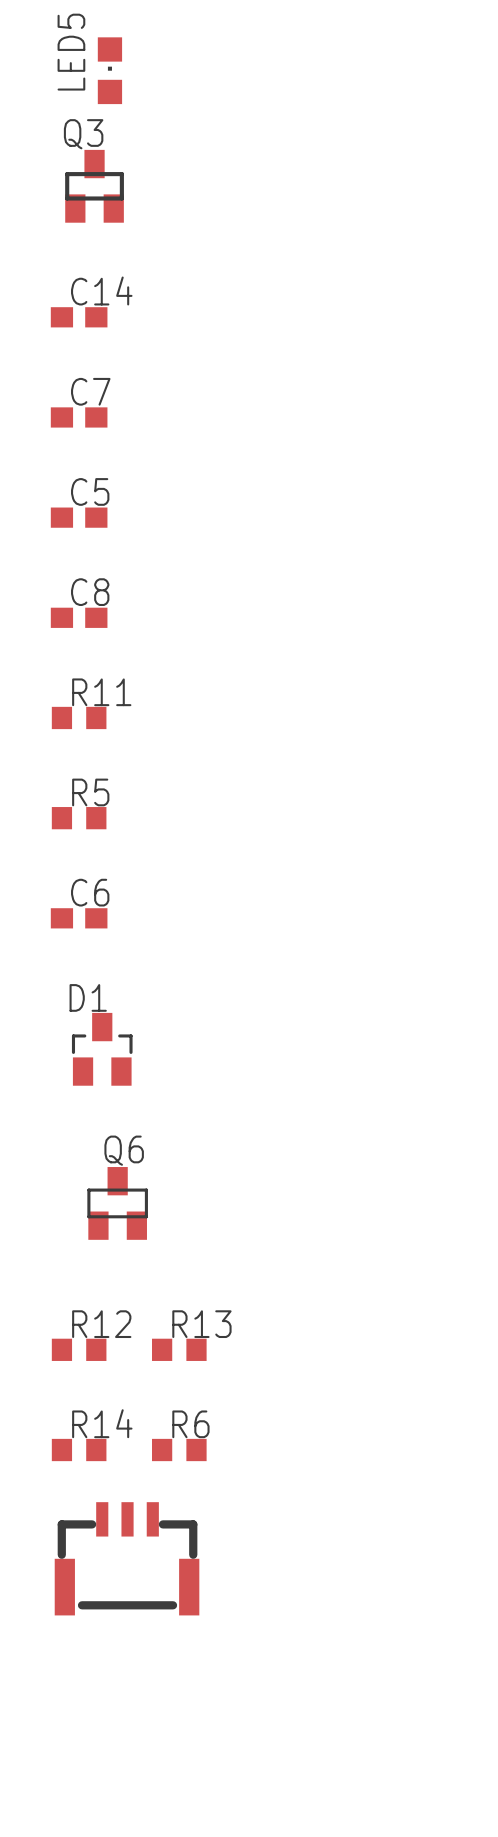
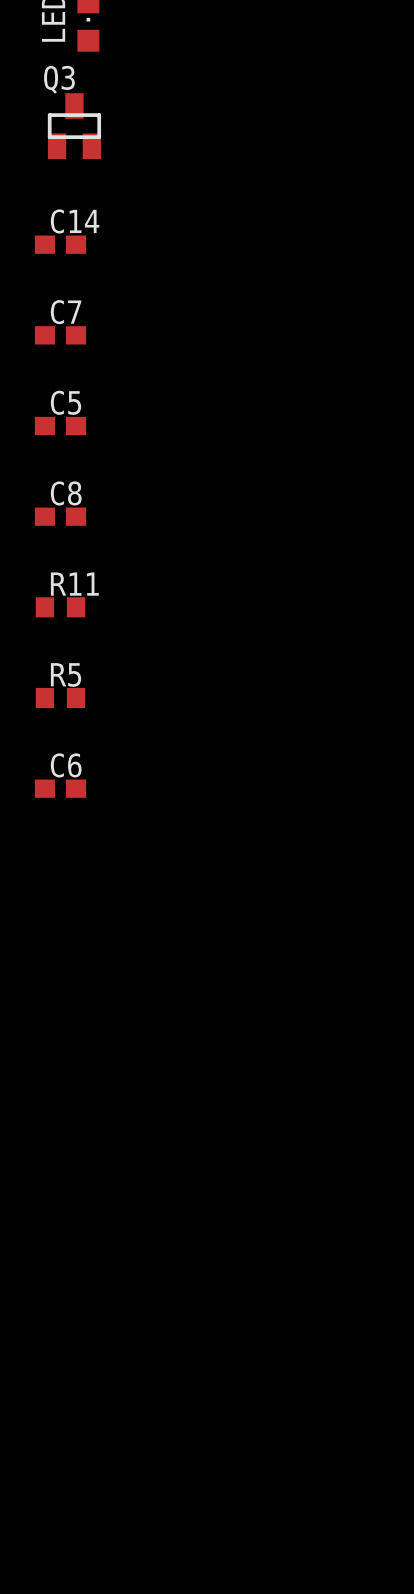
D1: (102, 1049) -> none
Q6: (117, 1203) -> none
R12: (79, 1349) -> none
R13: (179, 1349) -> none
R14: (79, 1450) -> none
R6: (179, 1450) -> none
part: (127, 1558) -> none

